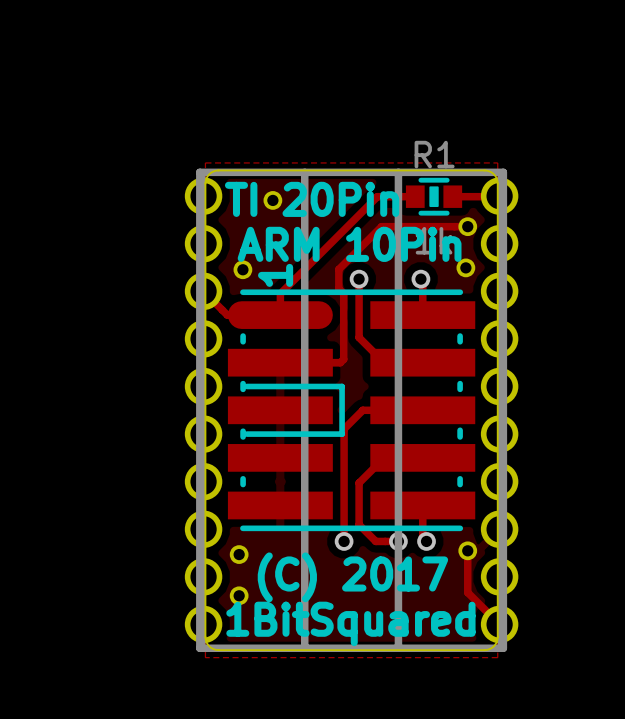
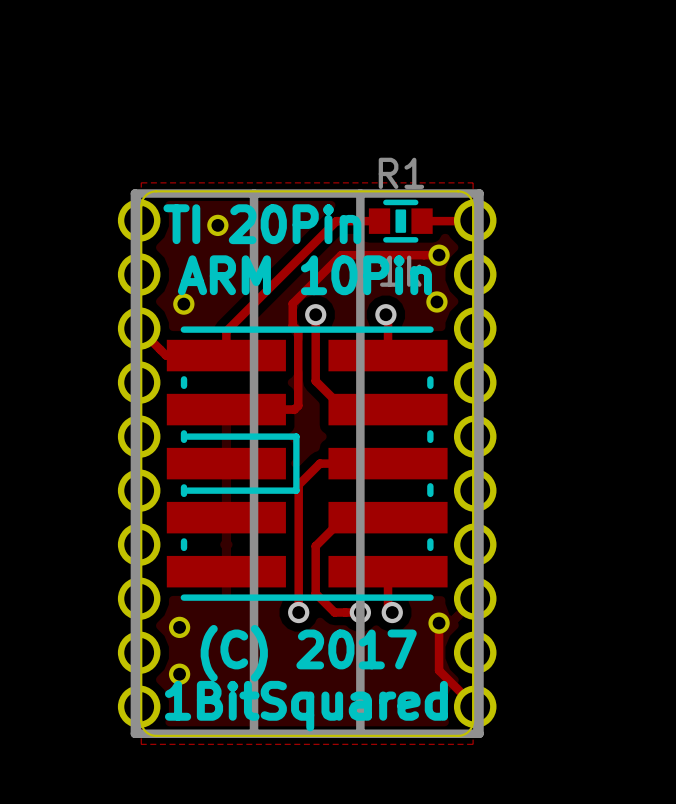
text: 1 (275, 275) -> none
part footprint: [227, 289, 476, 532] -> [166, 326, 448, 601]

